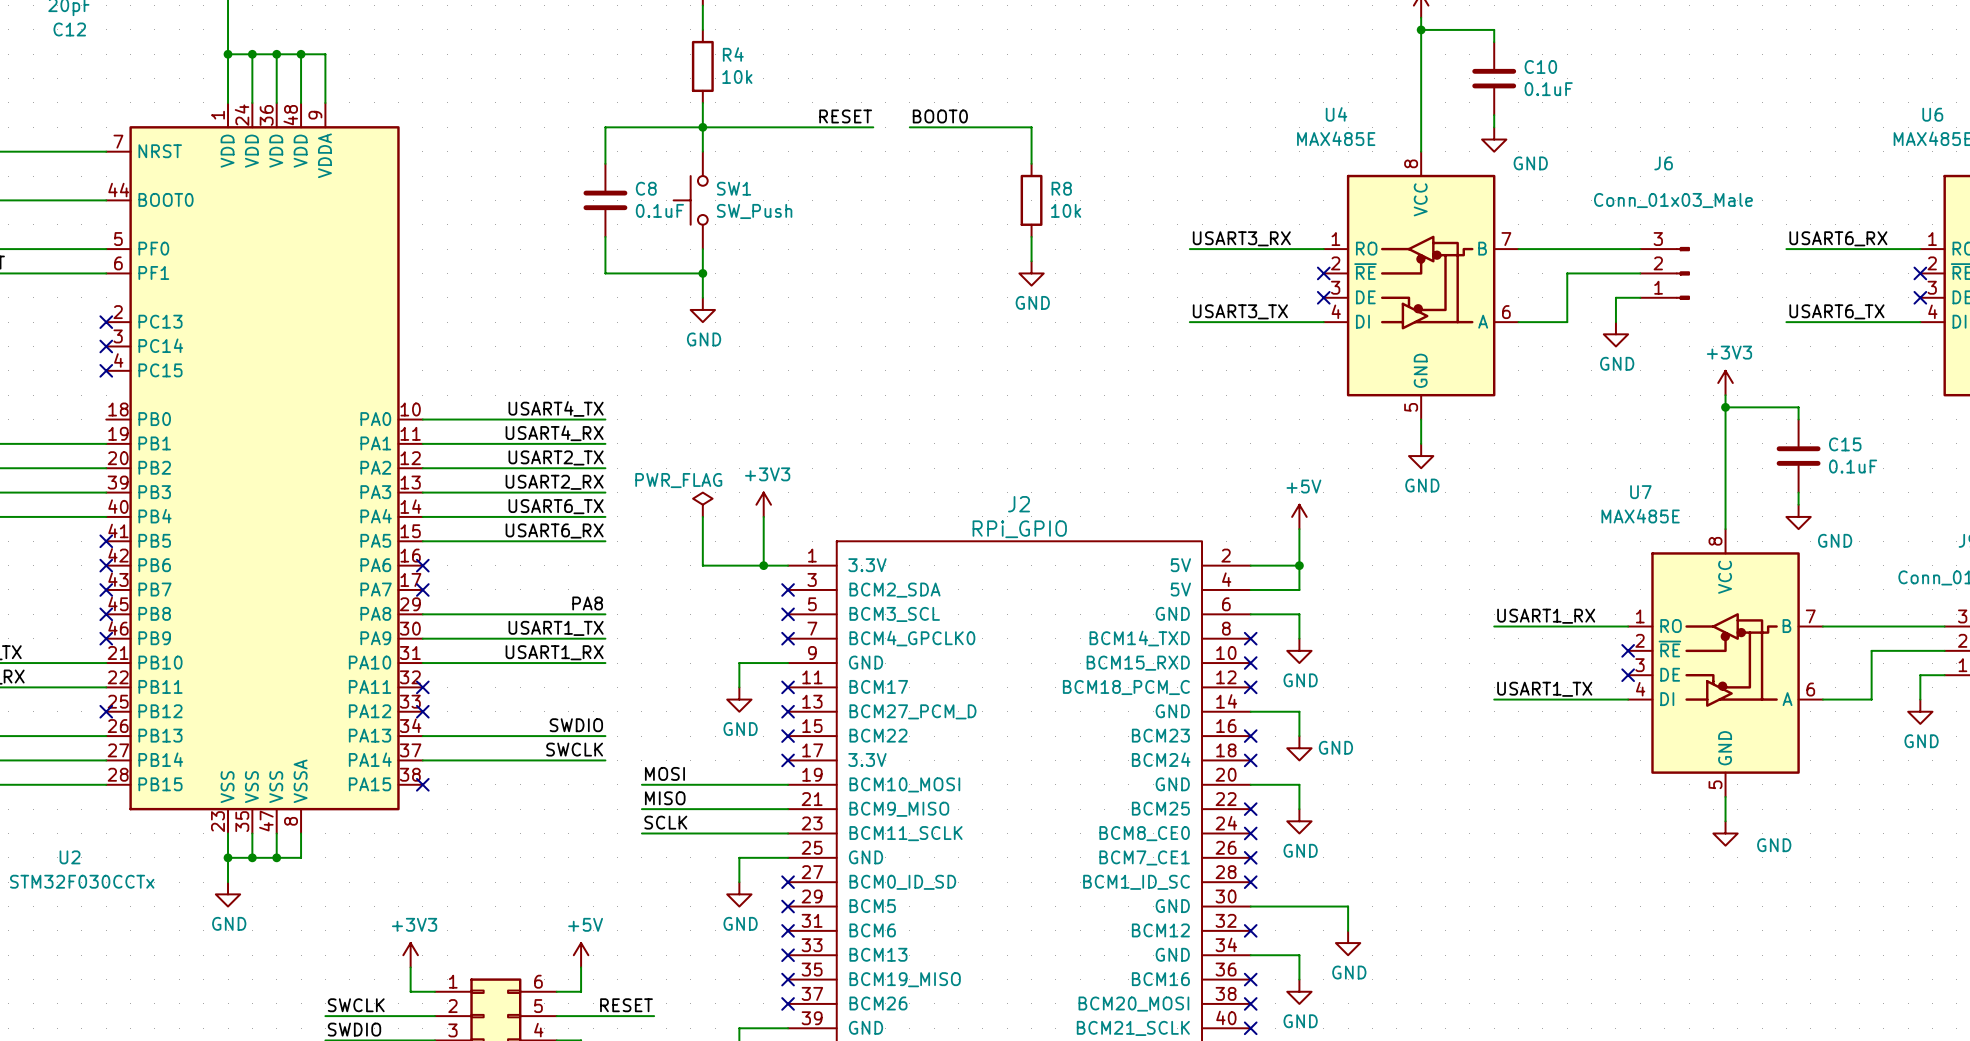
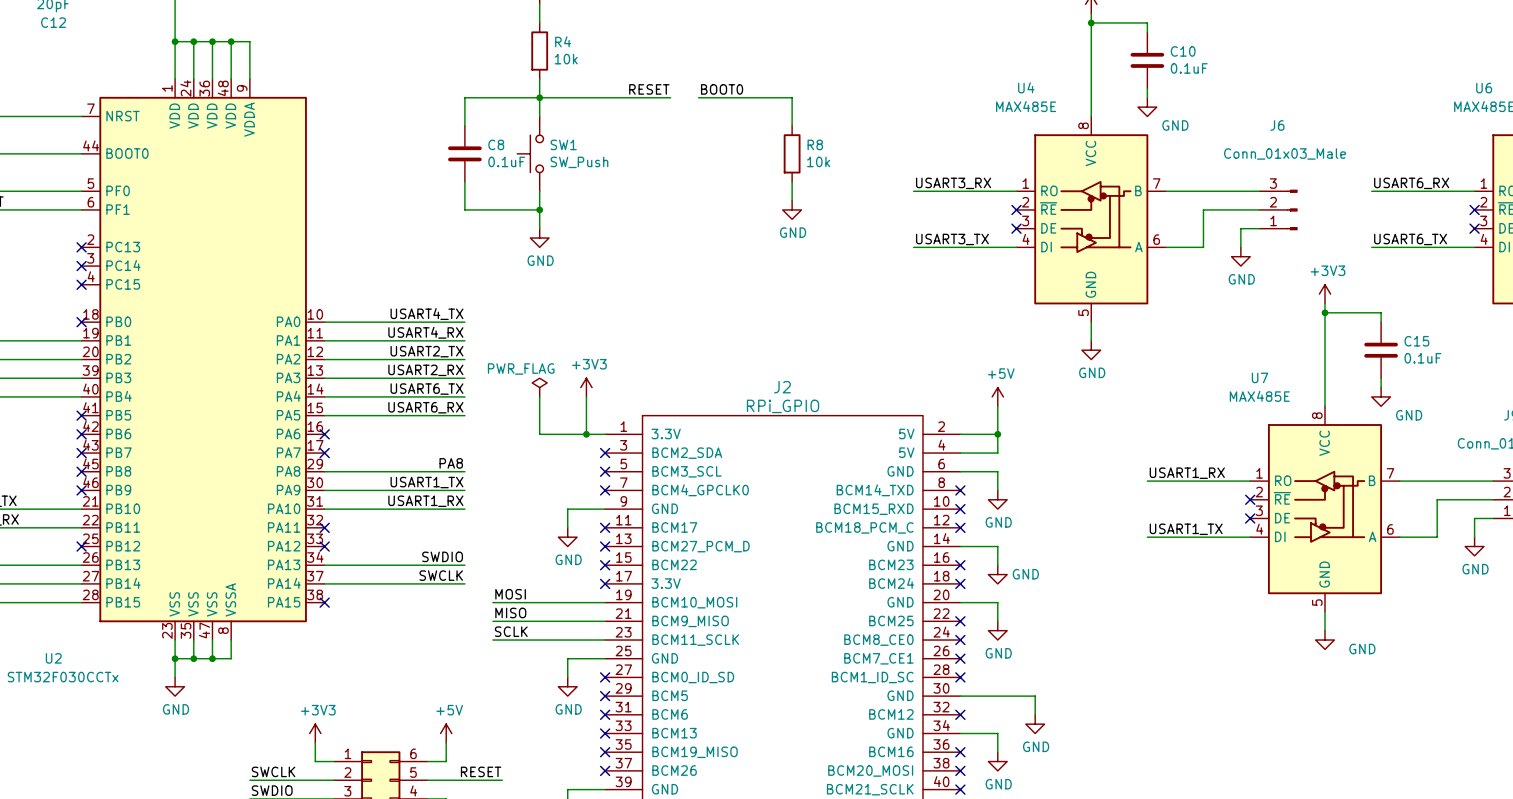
no-connect mark: none -> (81, 322)

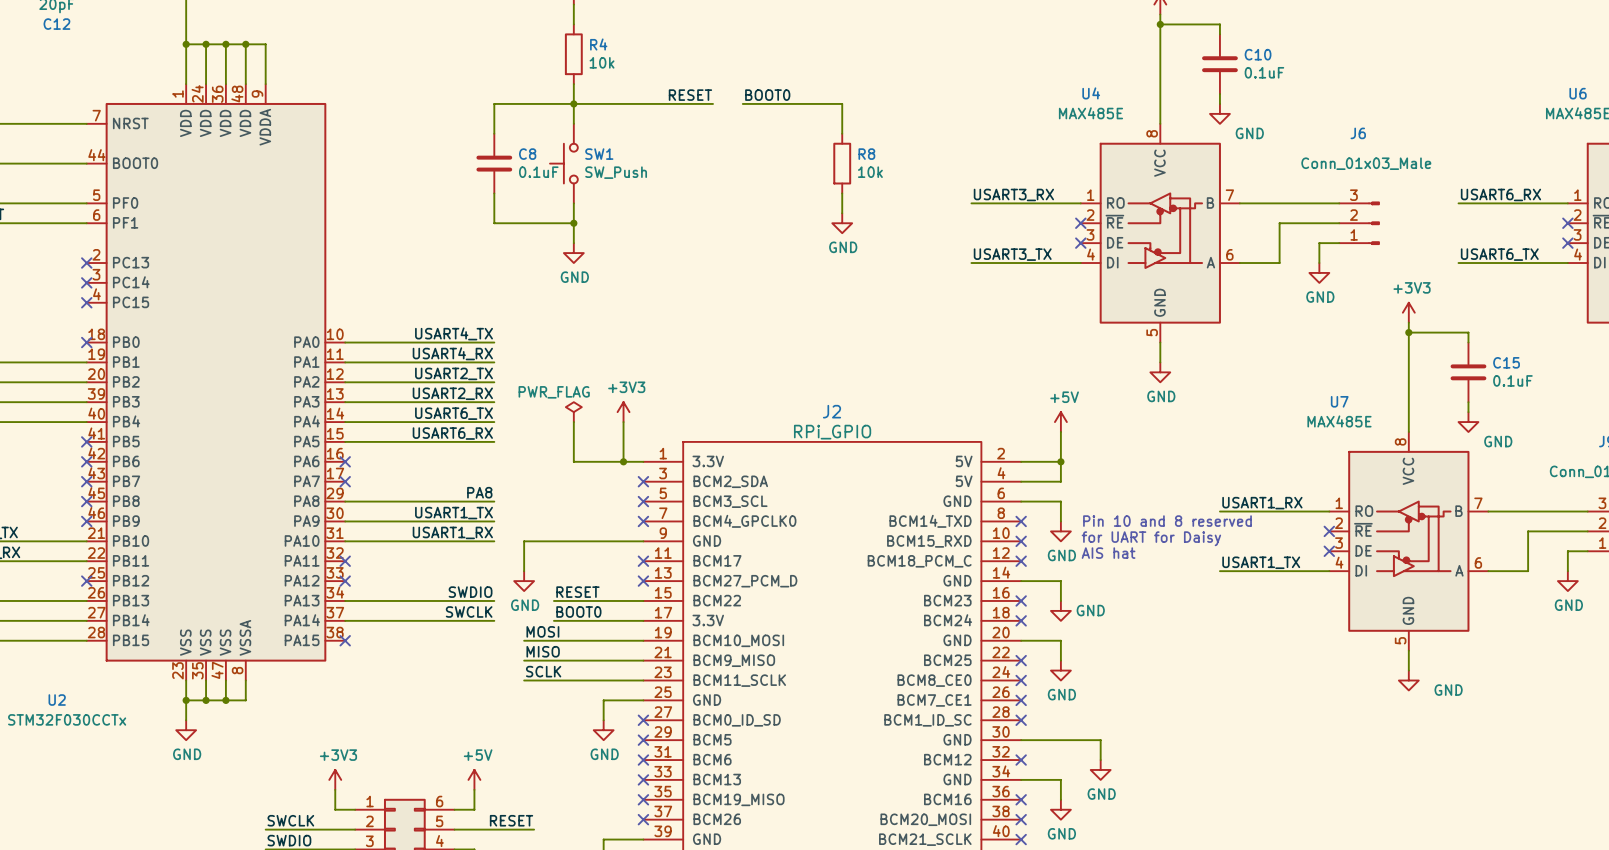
text: none -> Pin 10 and 8 reserved (1167, 521)
text: none -> for UART for Daisy (1151, 538)
wire: (567, 509) (567, 527) -> (603, 541) (524, 541) (524, 571)
text: none -> AIS hat (1108, 553)
power symbol position: GND (567, 537) -> GND (524, 581)
label: none -> RESET (577, 592)
wire: none -> (553, 600) (643, 600)
no-connect mark: (605, 565) -> none
label: none -> BOOT0 (578, 611)
wire: none -> (553, 620) (643, 620)
no-connect mark: (605, 583) -> none

